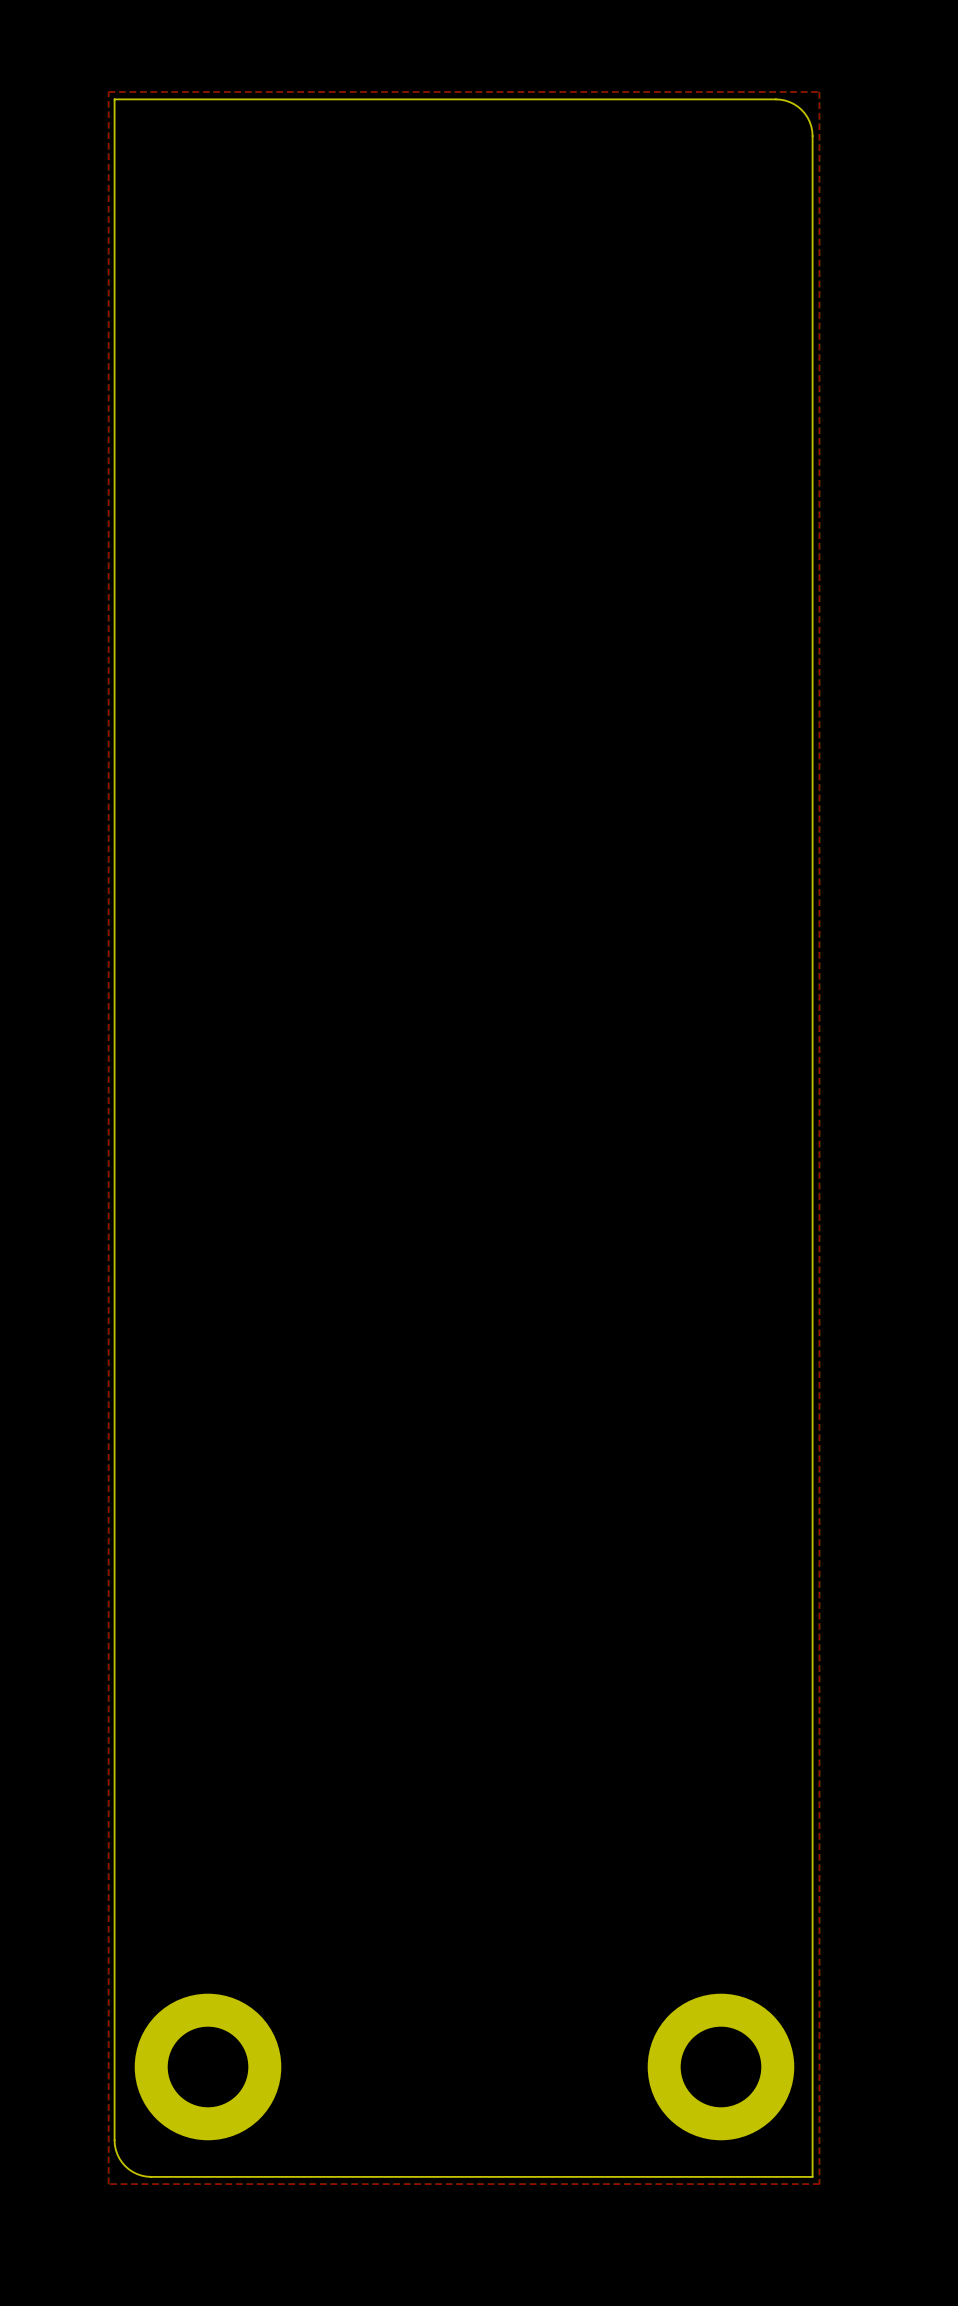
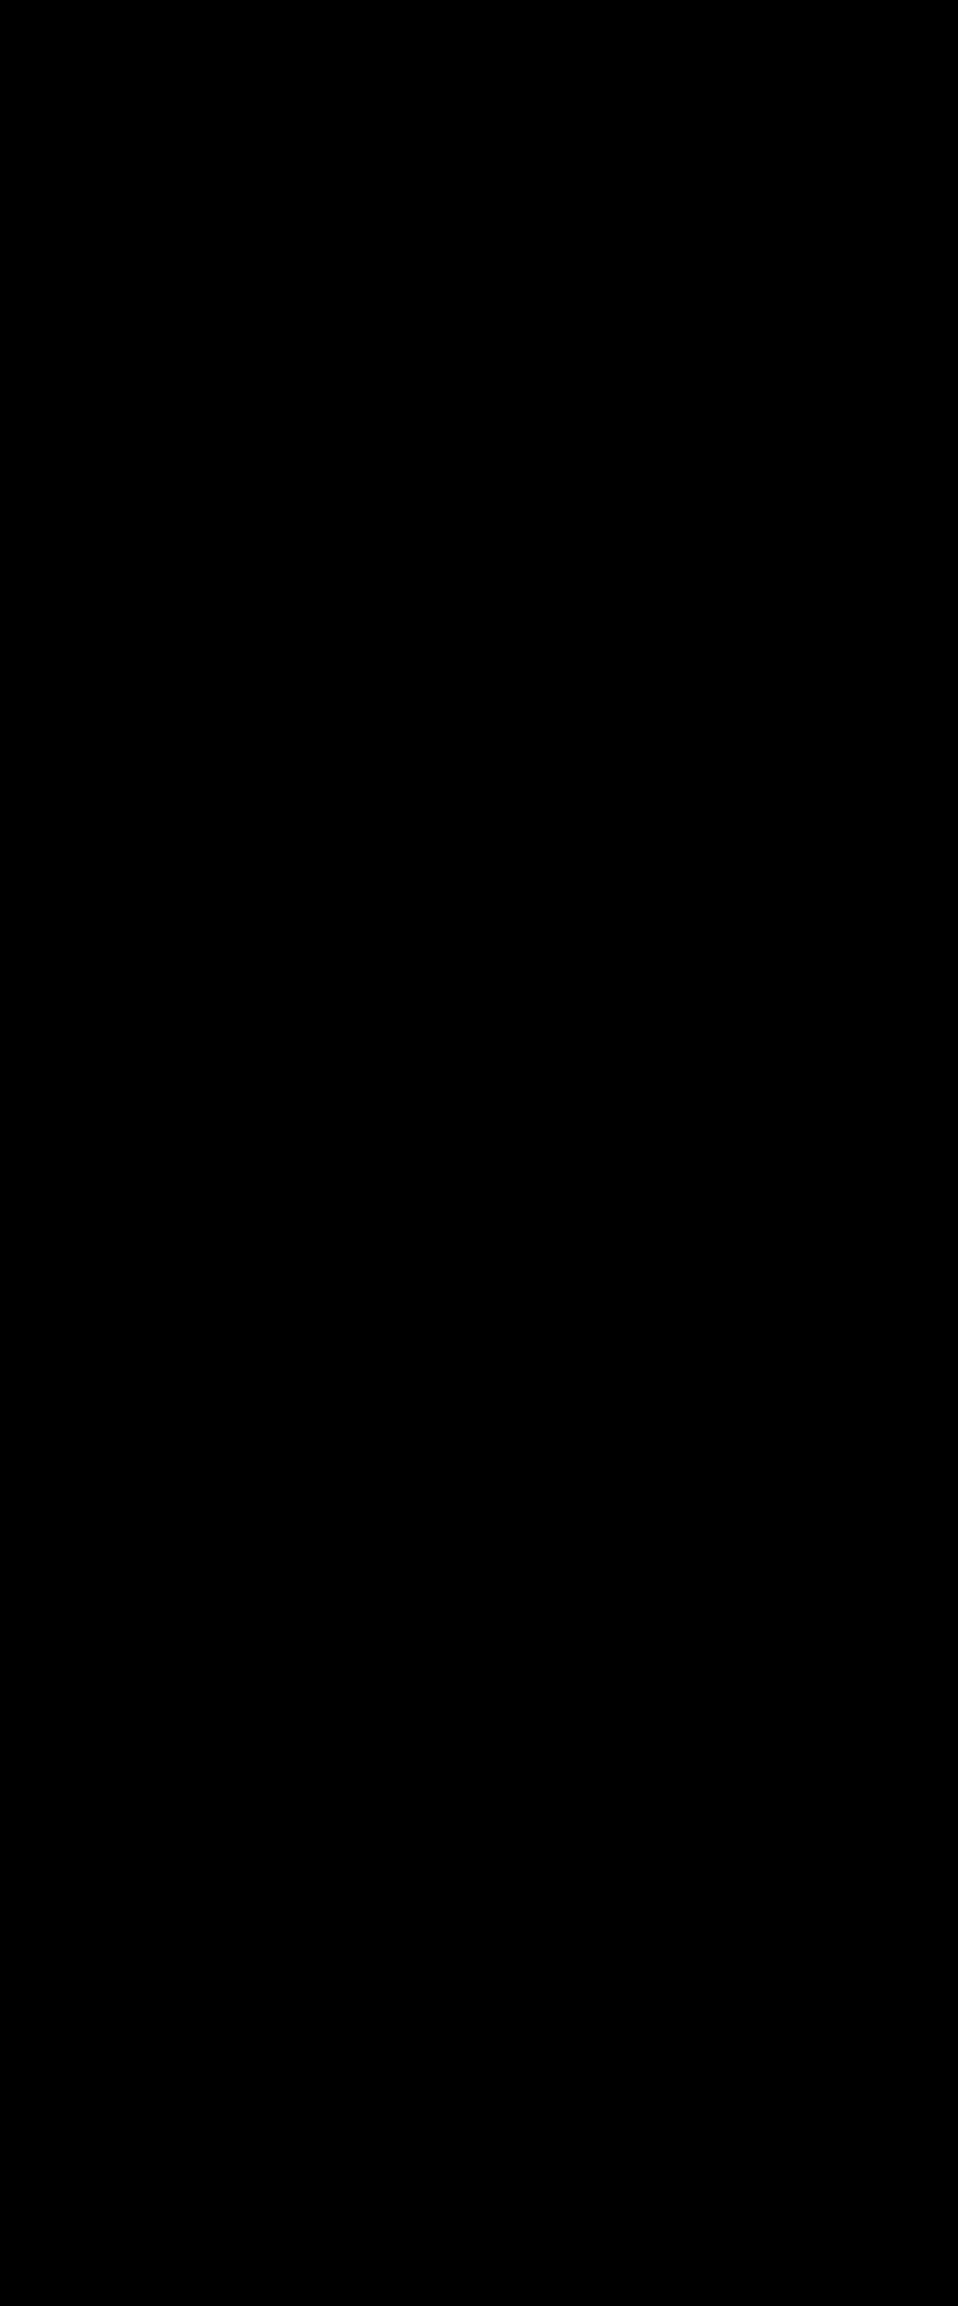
top zone outline: (108, 91) (819, 91) (819, 2184) (108, 2184) (108, 91) -> none
board edge: (114, 99) (775, 99) (789, 102) (798, 106) (805, 113) (811, 126) (812, 2176) (151, 2176) (141, 2175) (128, 2169) (122, 2162) (115, 2149) (114, 99) -> none
part: (208, 2066) -> none
part: (720, 2066) -> none

